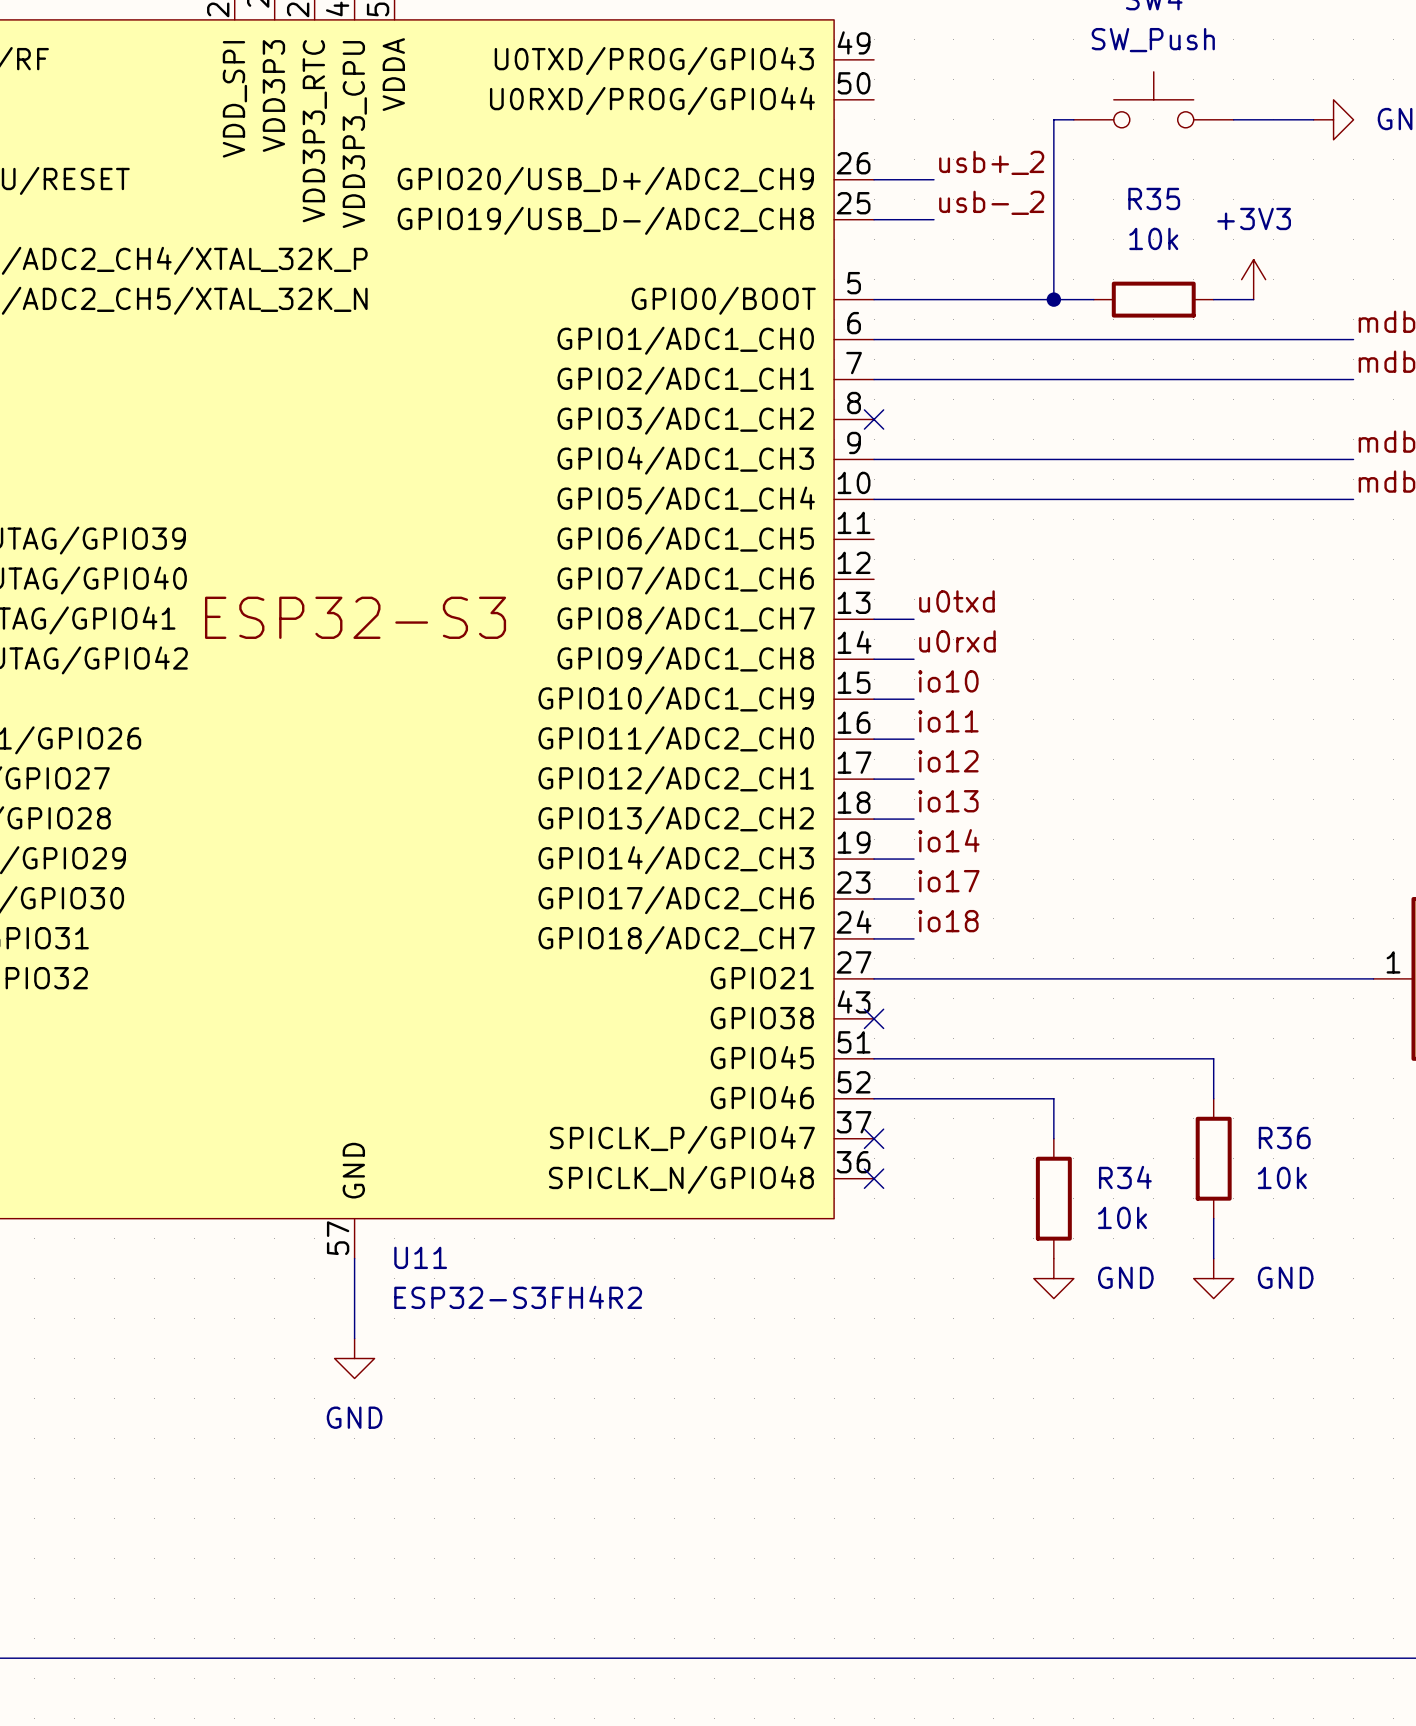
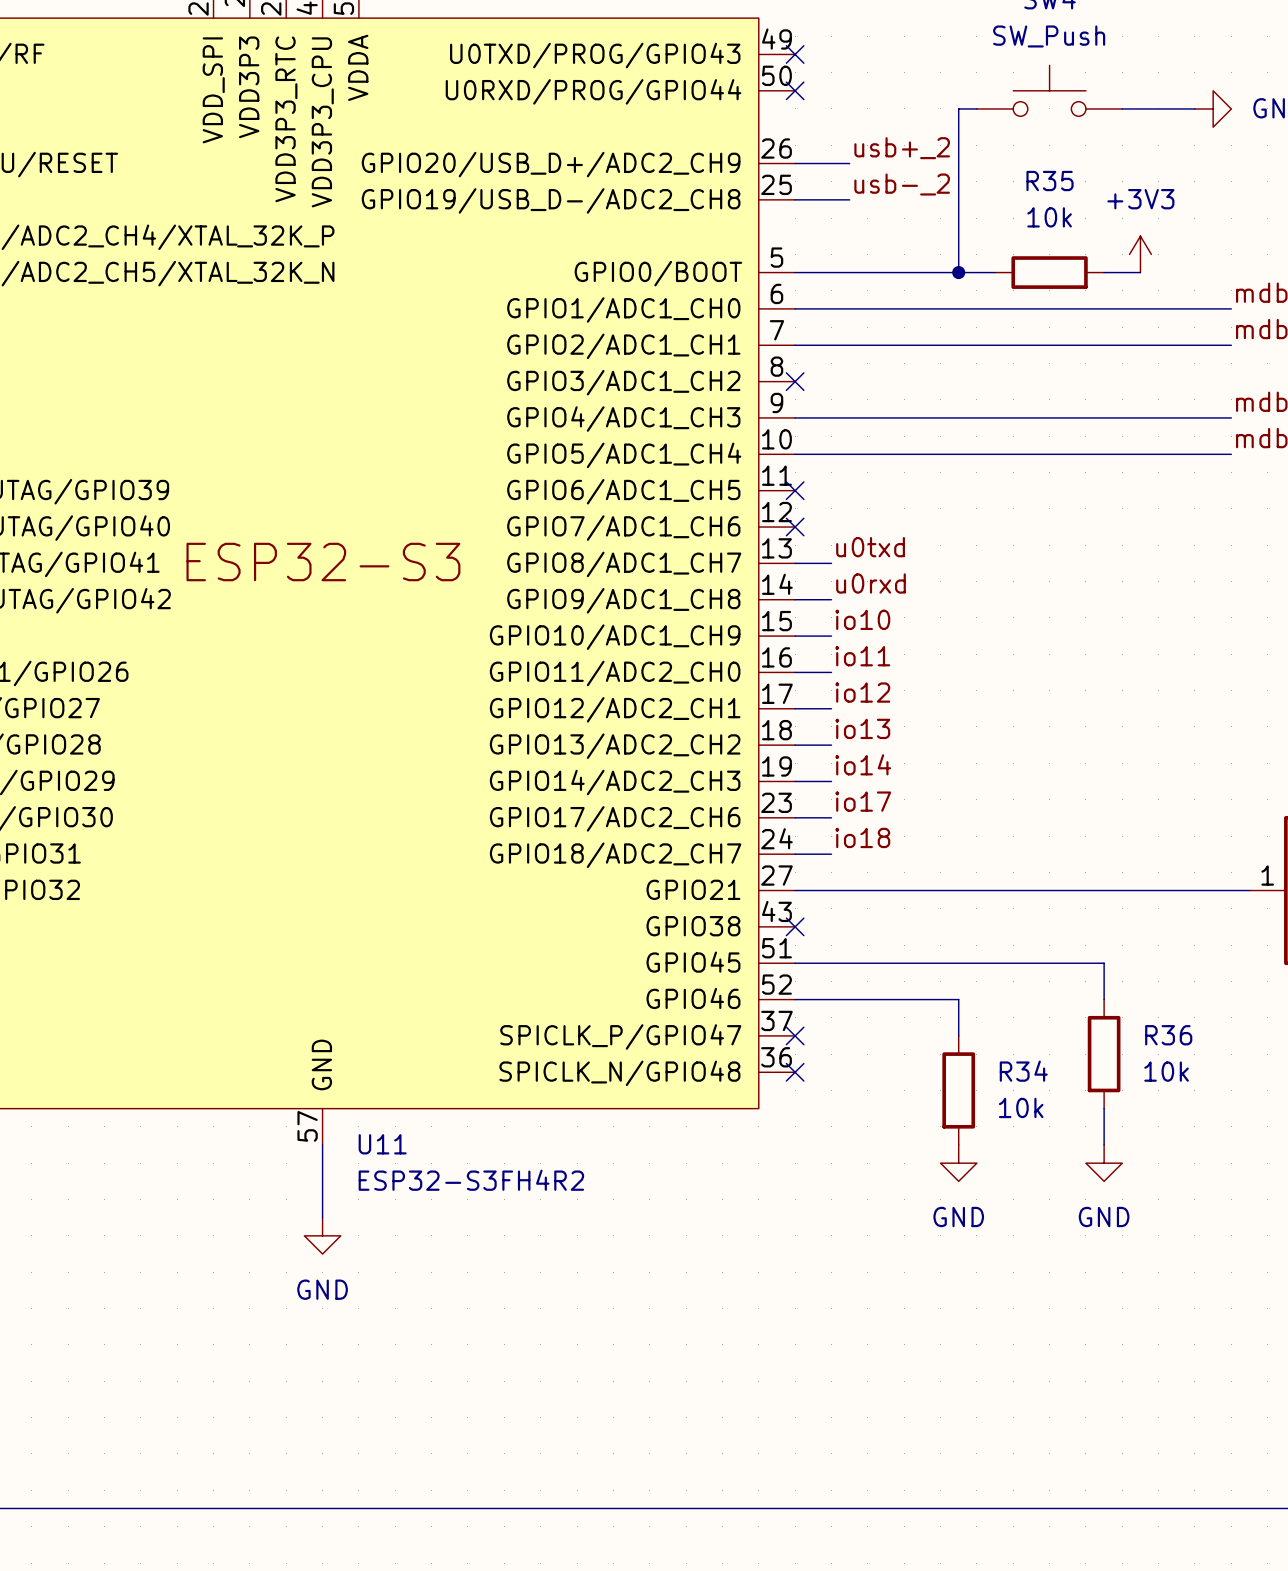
no-connect mark: none -> (795, 54)
no-connect mark: none -> (795, 90)
no-connect mark: none -> (795, 490)
no-connect mark: none -> (795, 527)
power symbol text position: GND (1125, 1277) -> GND (958, 1217)
power symbol text position: GND (1285, 1277) -> GND (1104, 1217)

